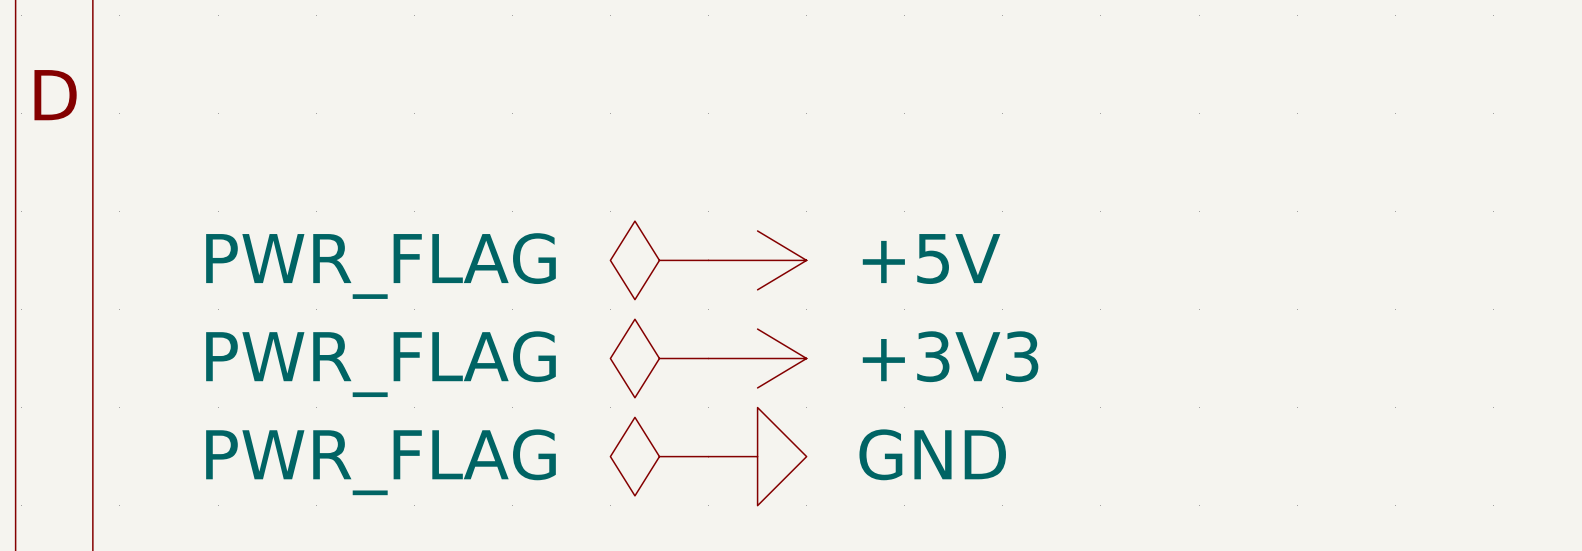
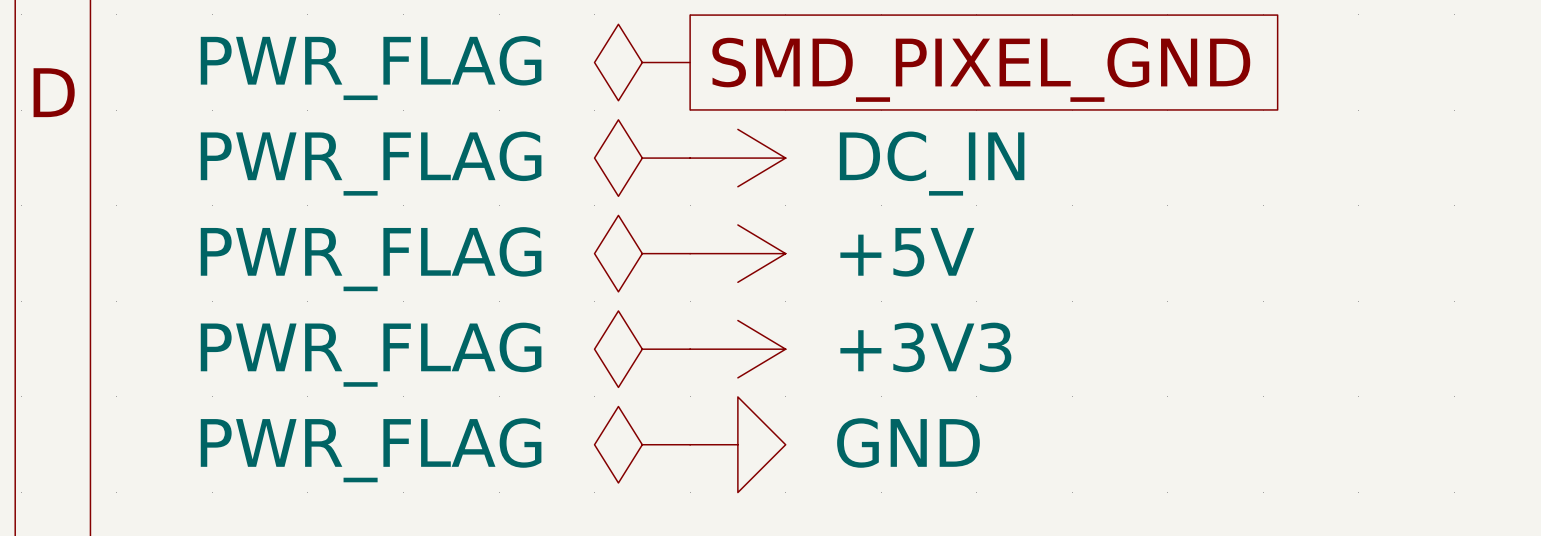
power symbol: none -> PWR_FLAG (642, 62)
global label: none -> SMD_PIXEL_GND (981, 69)
power symbol: none -> PWR_FLAG (642, 158)
power symbol: none -> DC_IN (737, 158)

